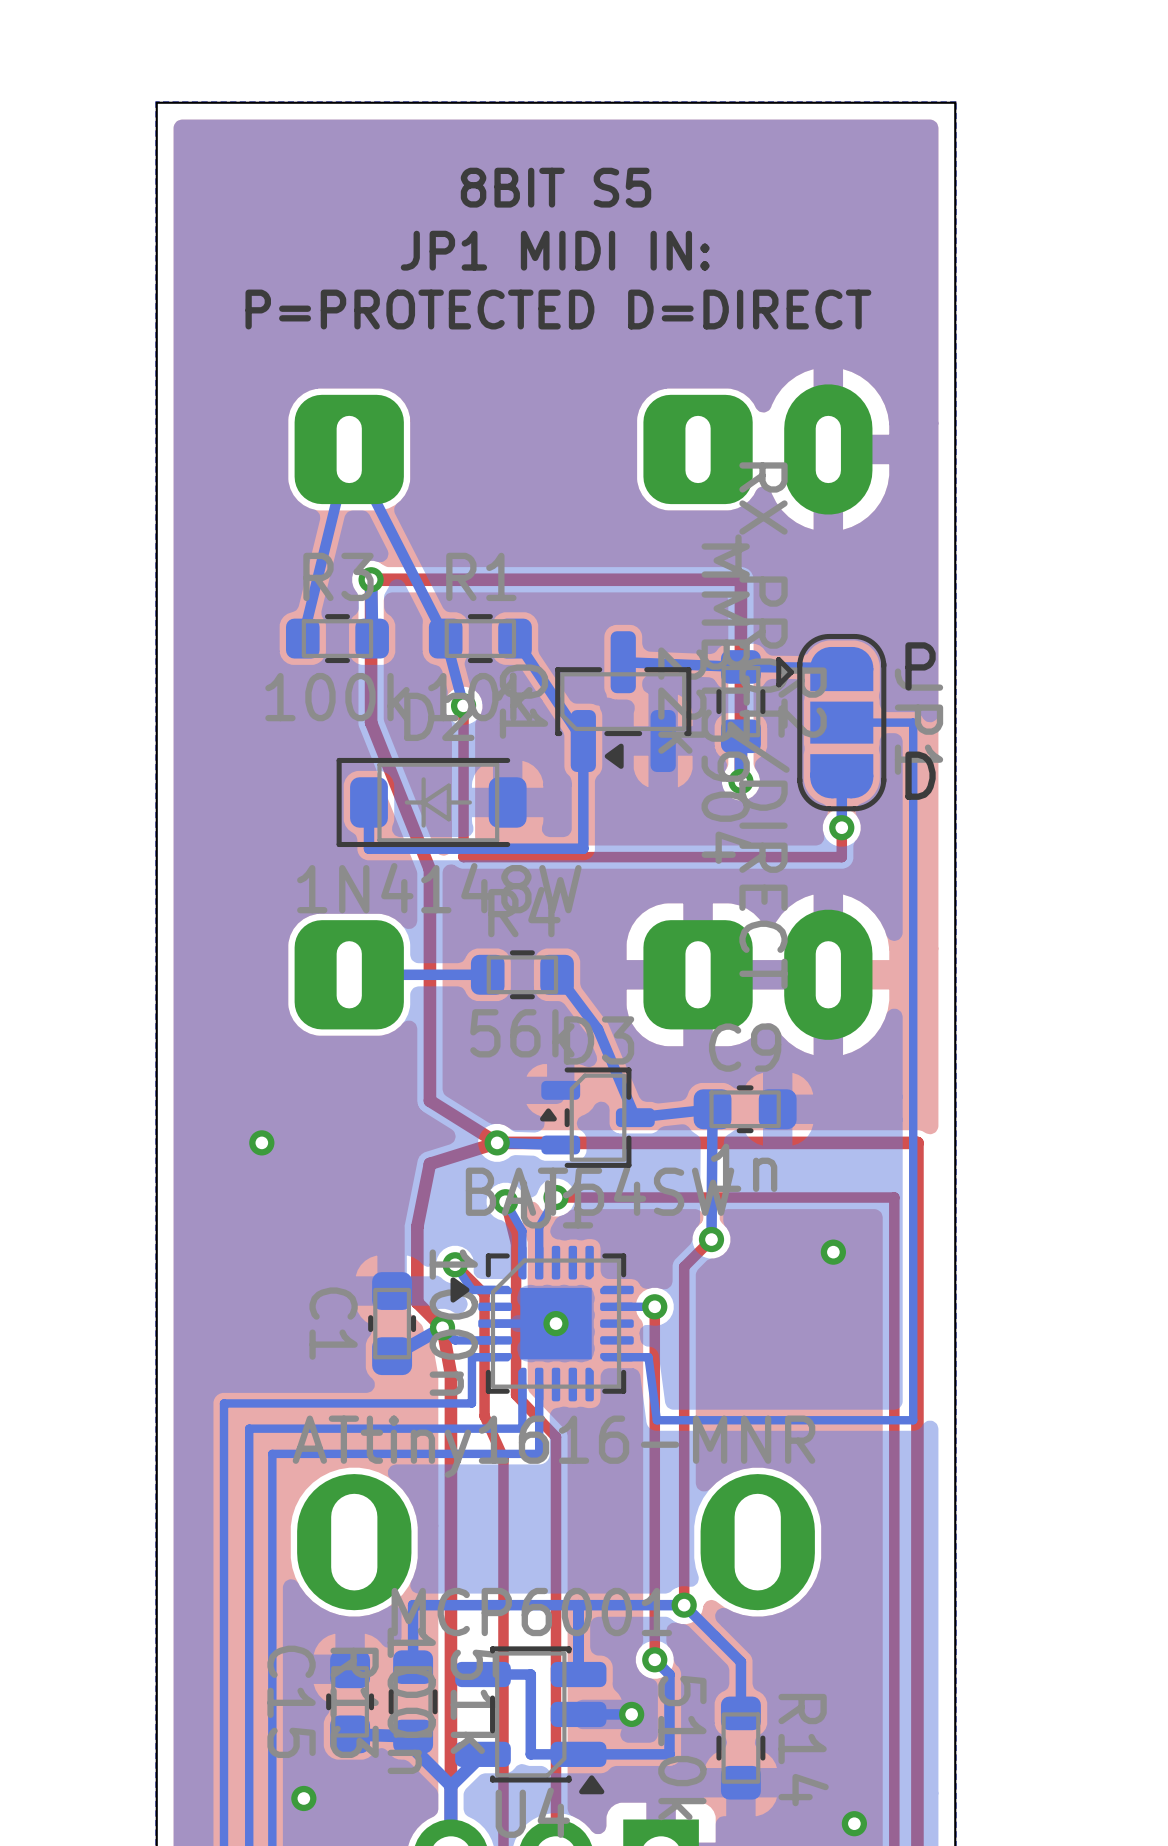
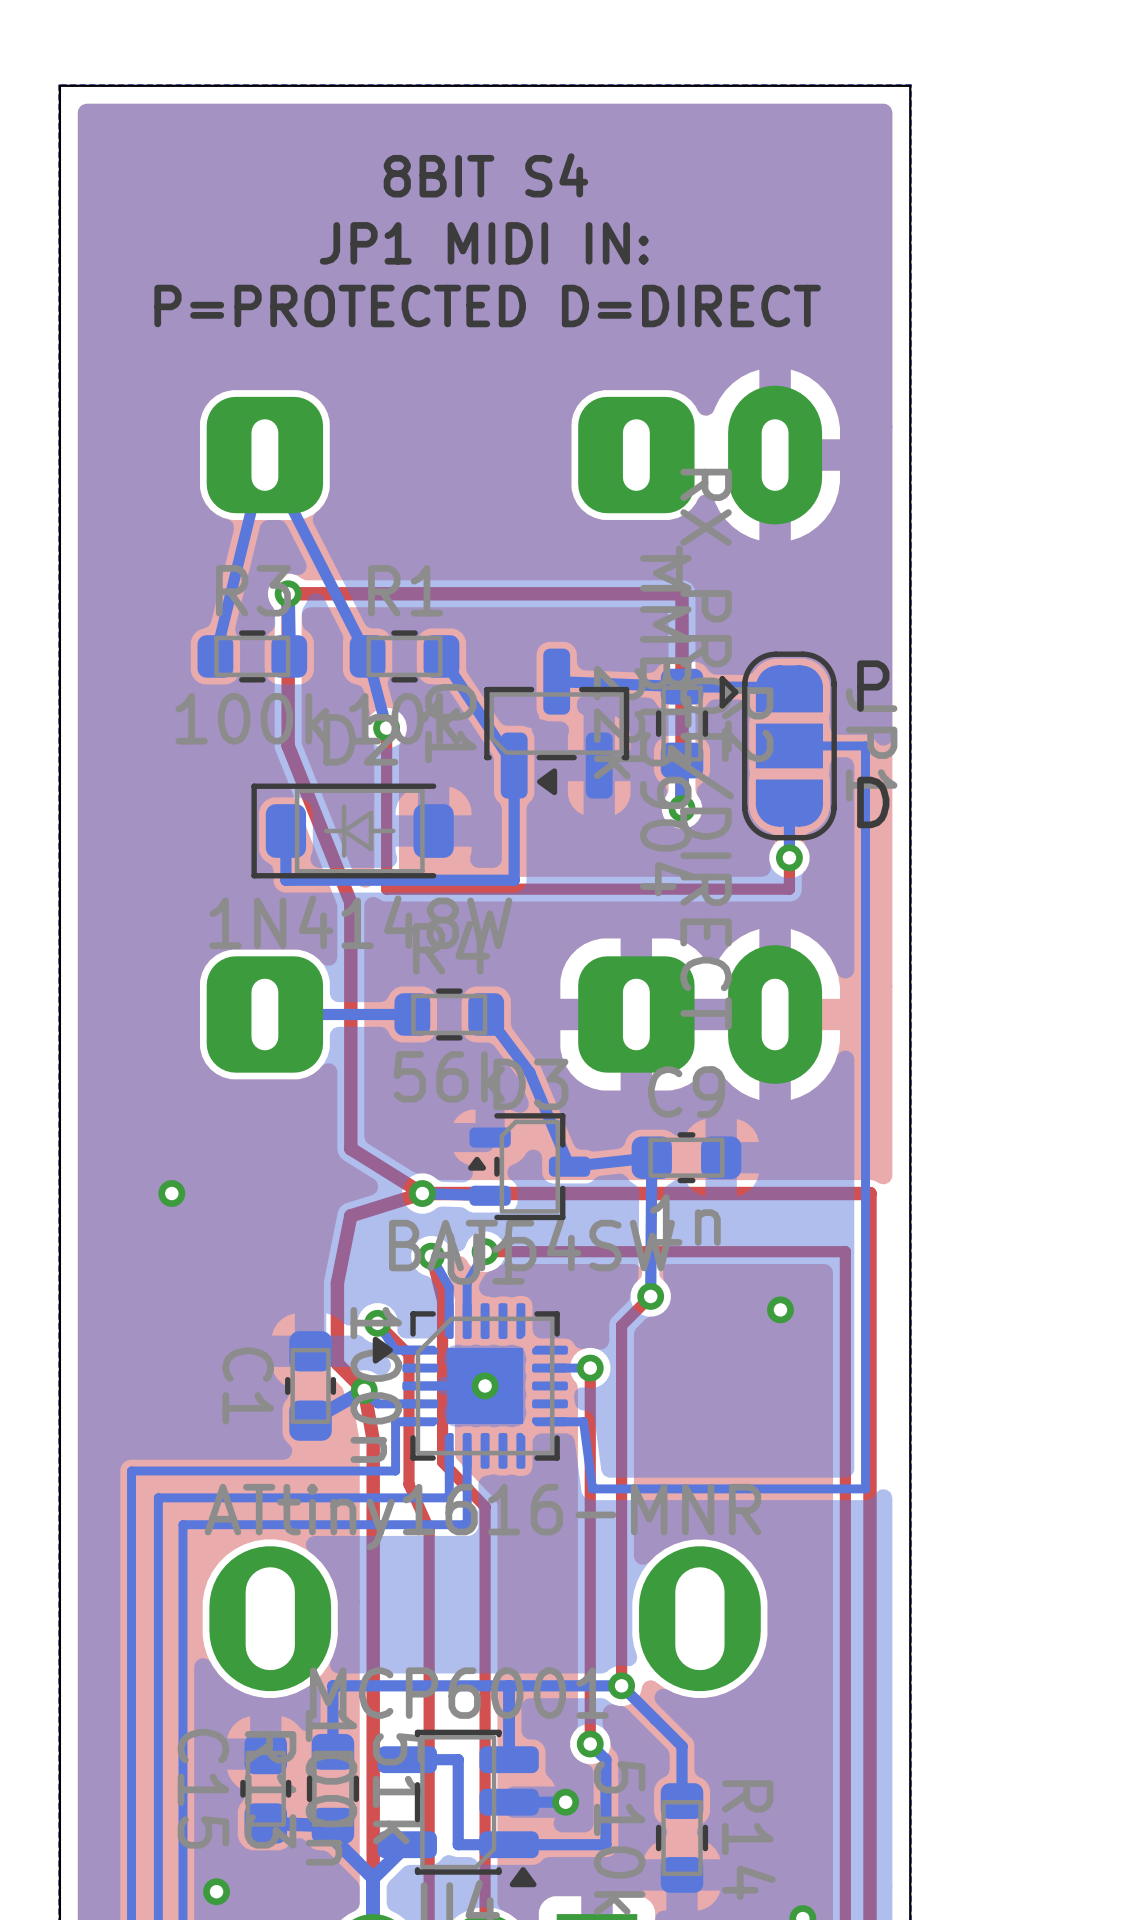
text: 8BIT S5 (556, 187) -> 8BIT S4 (485, 175)

